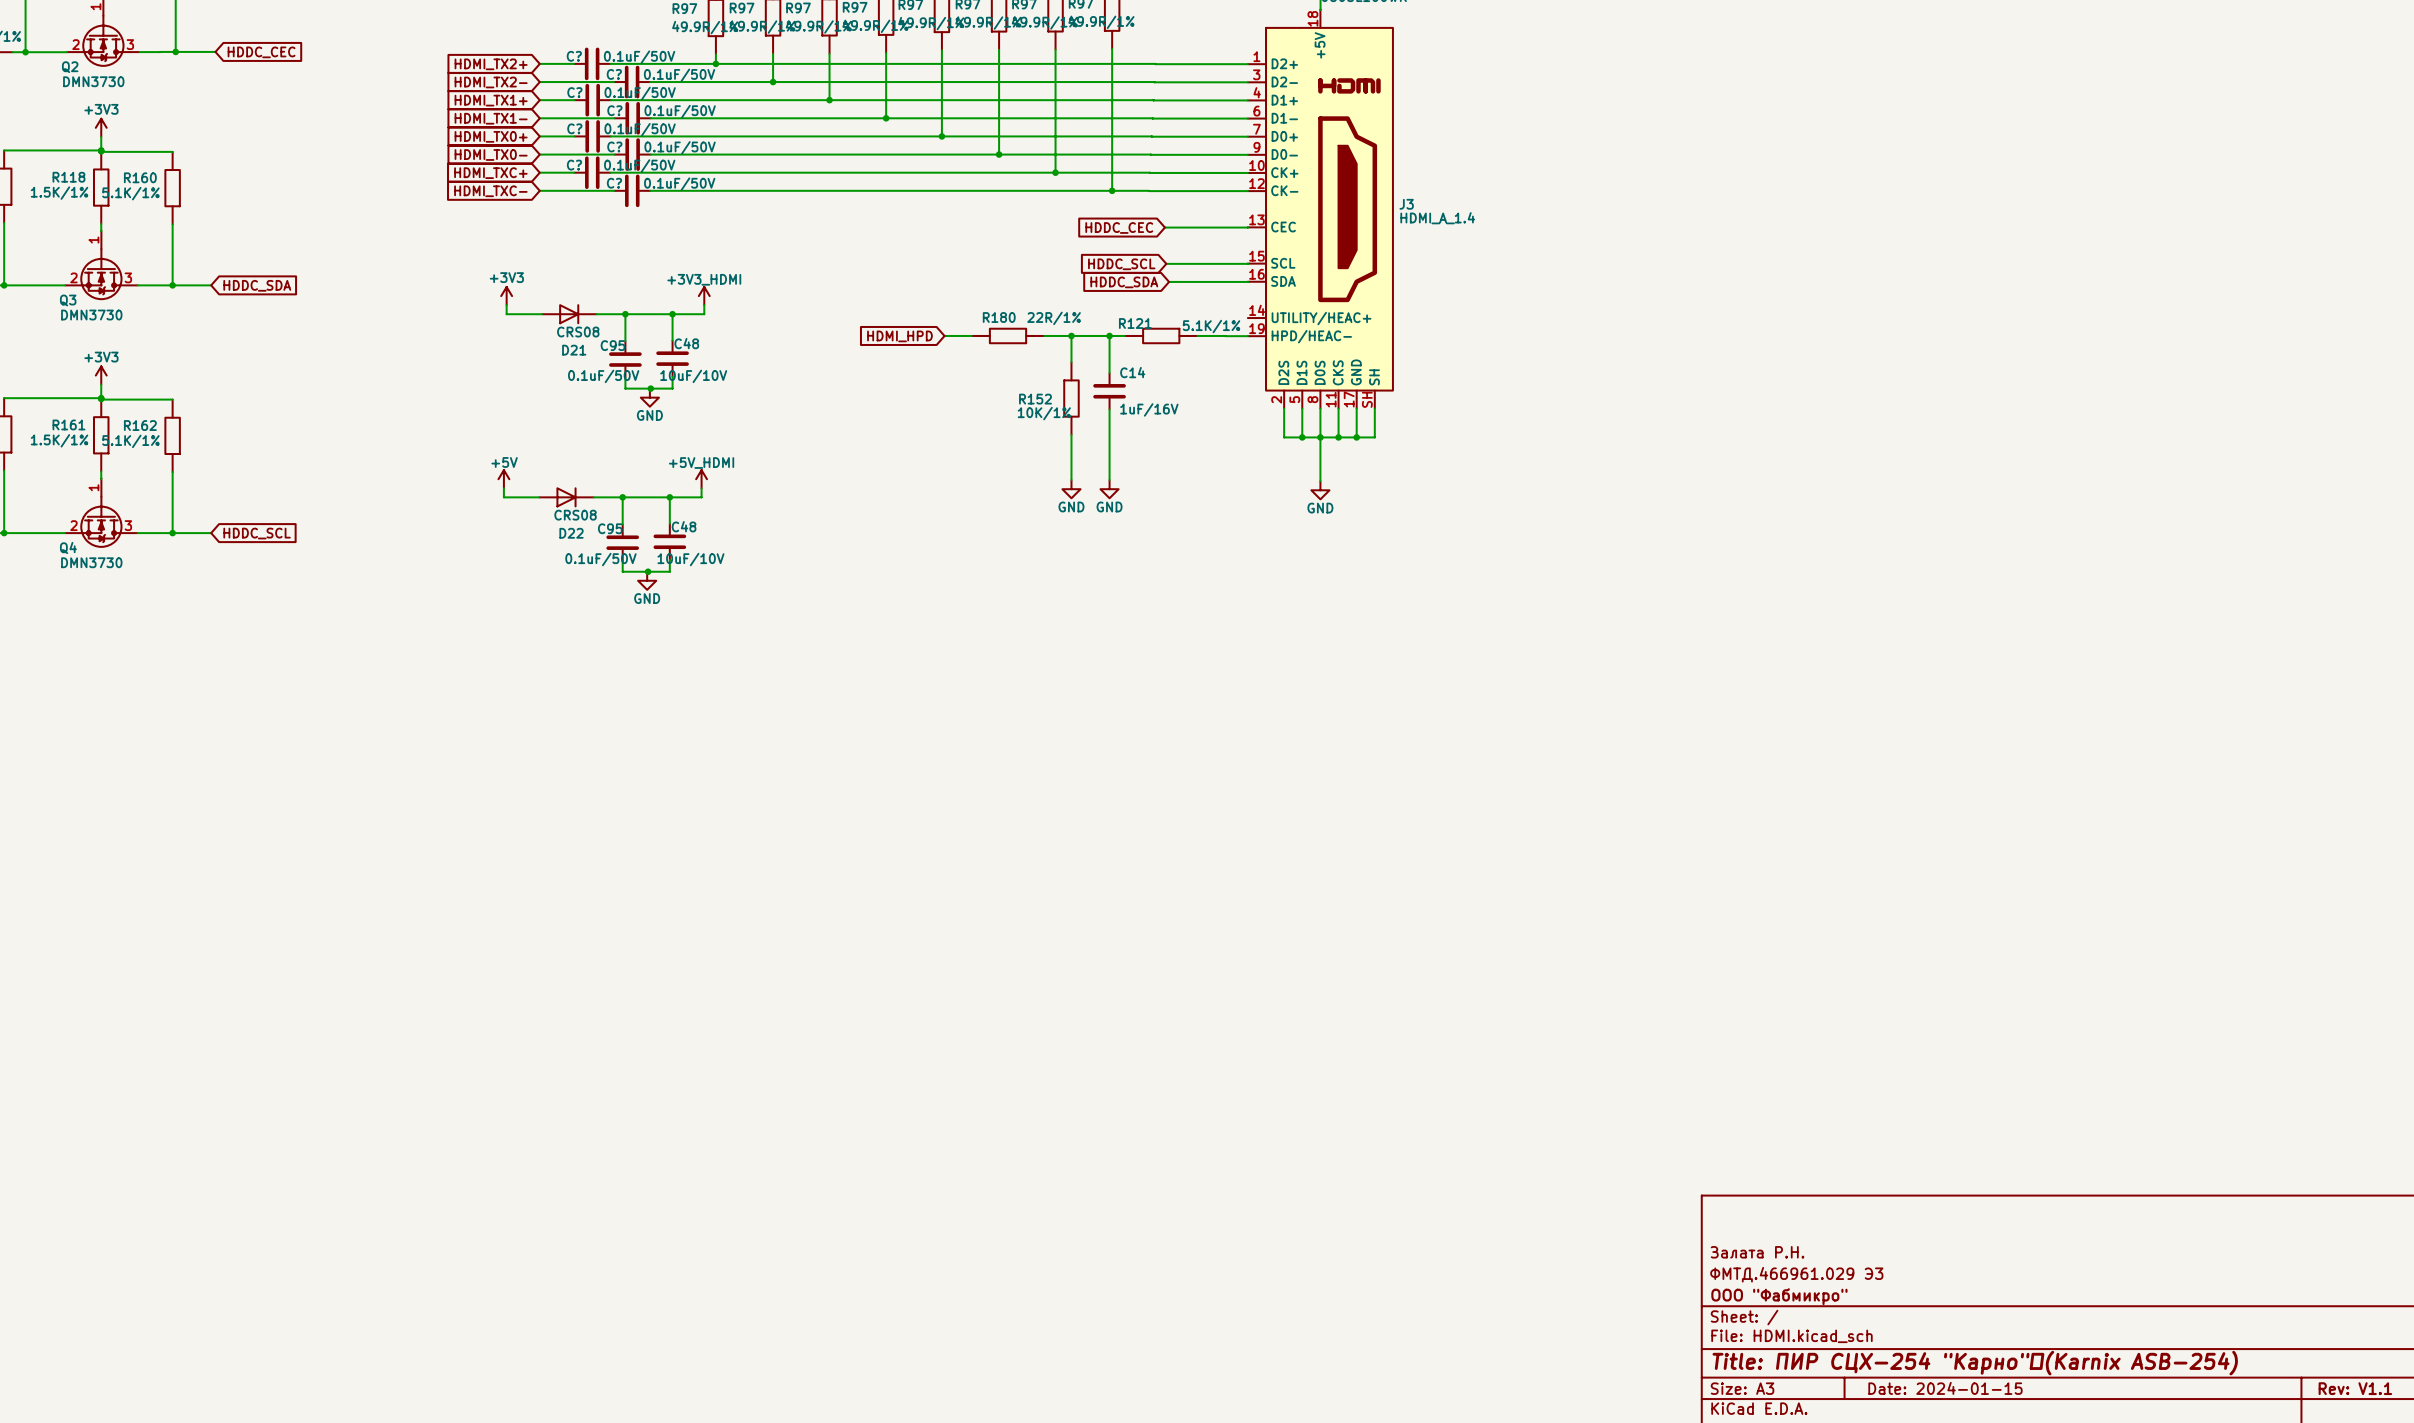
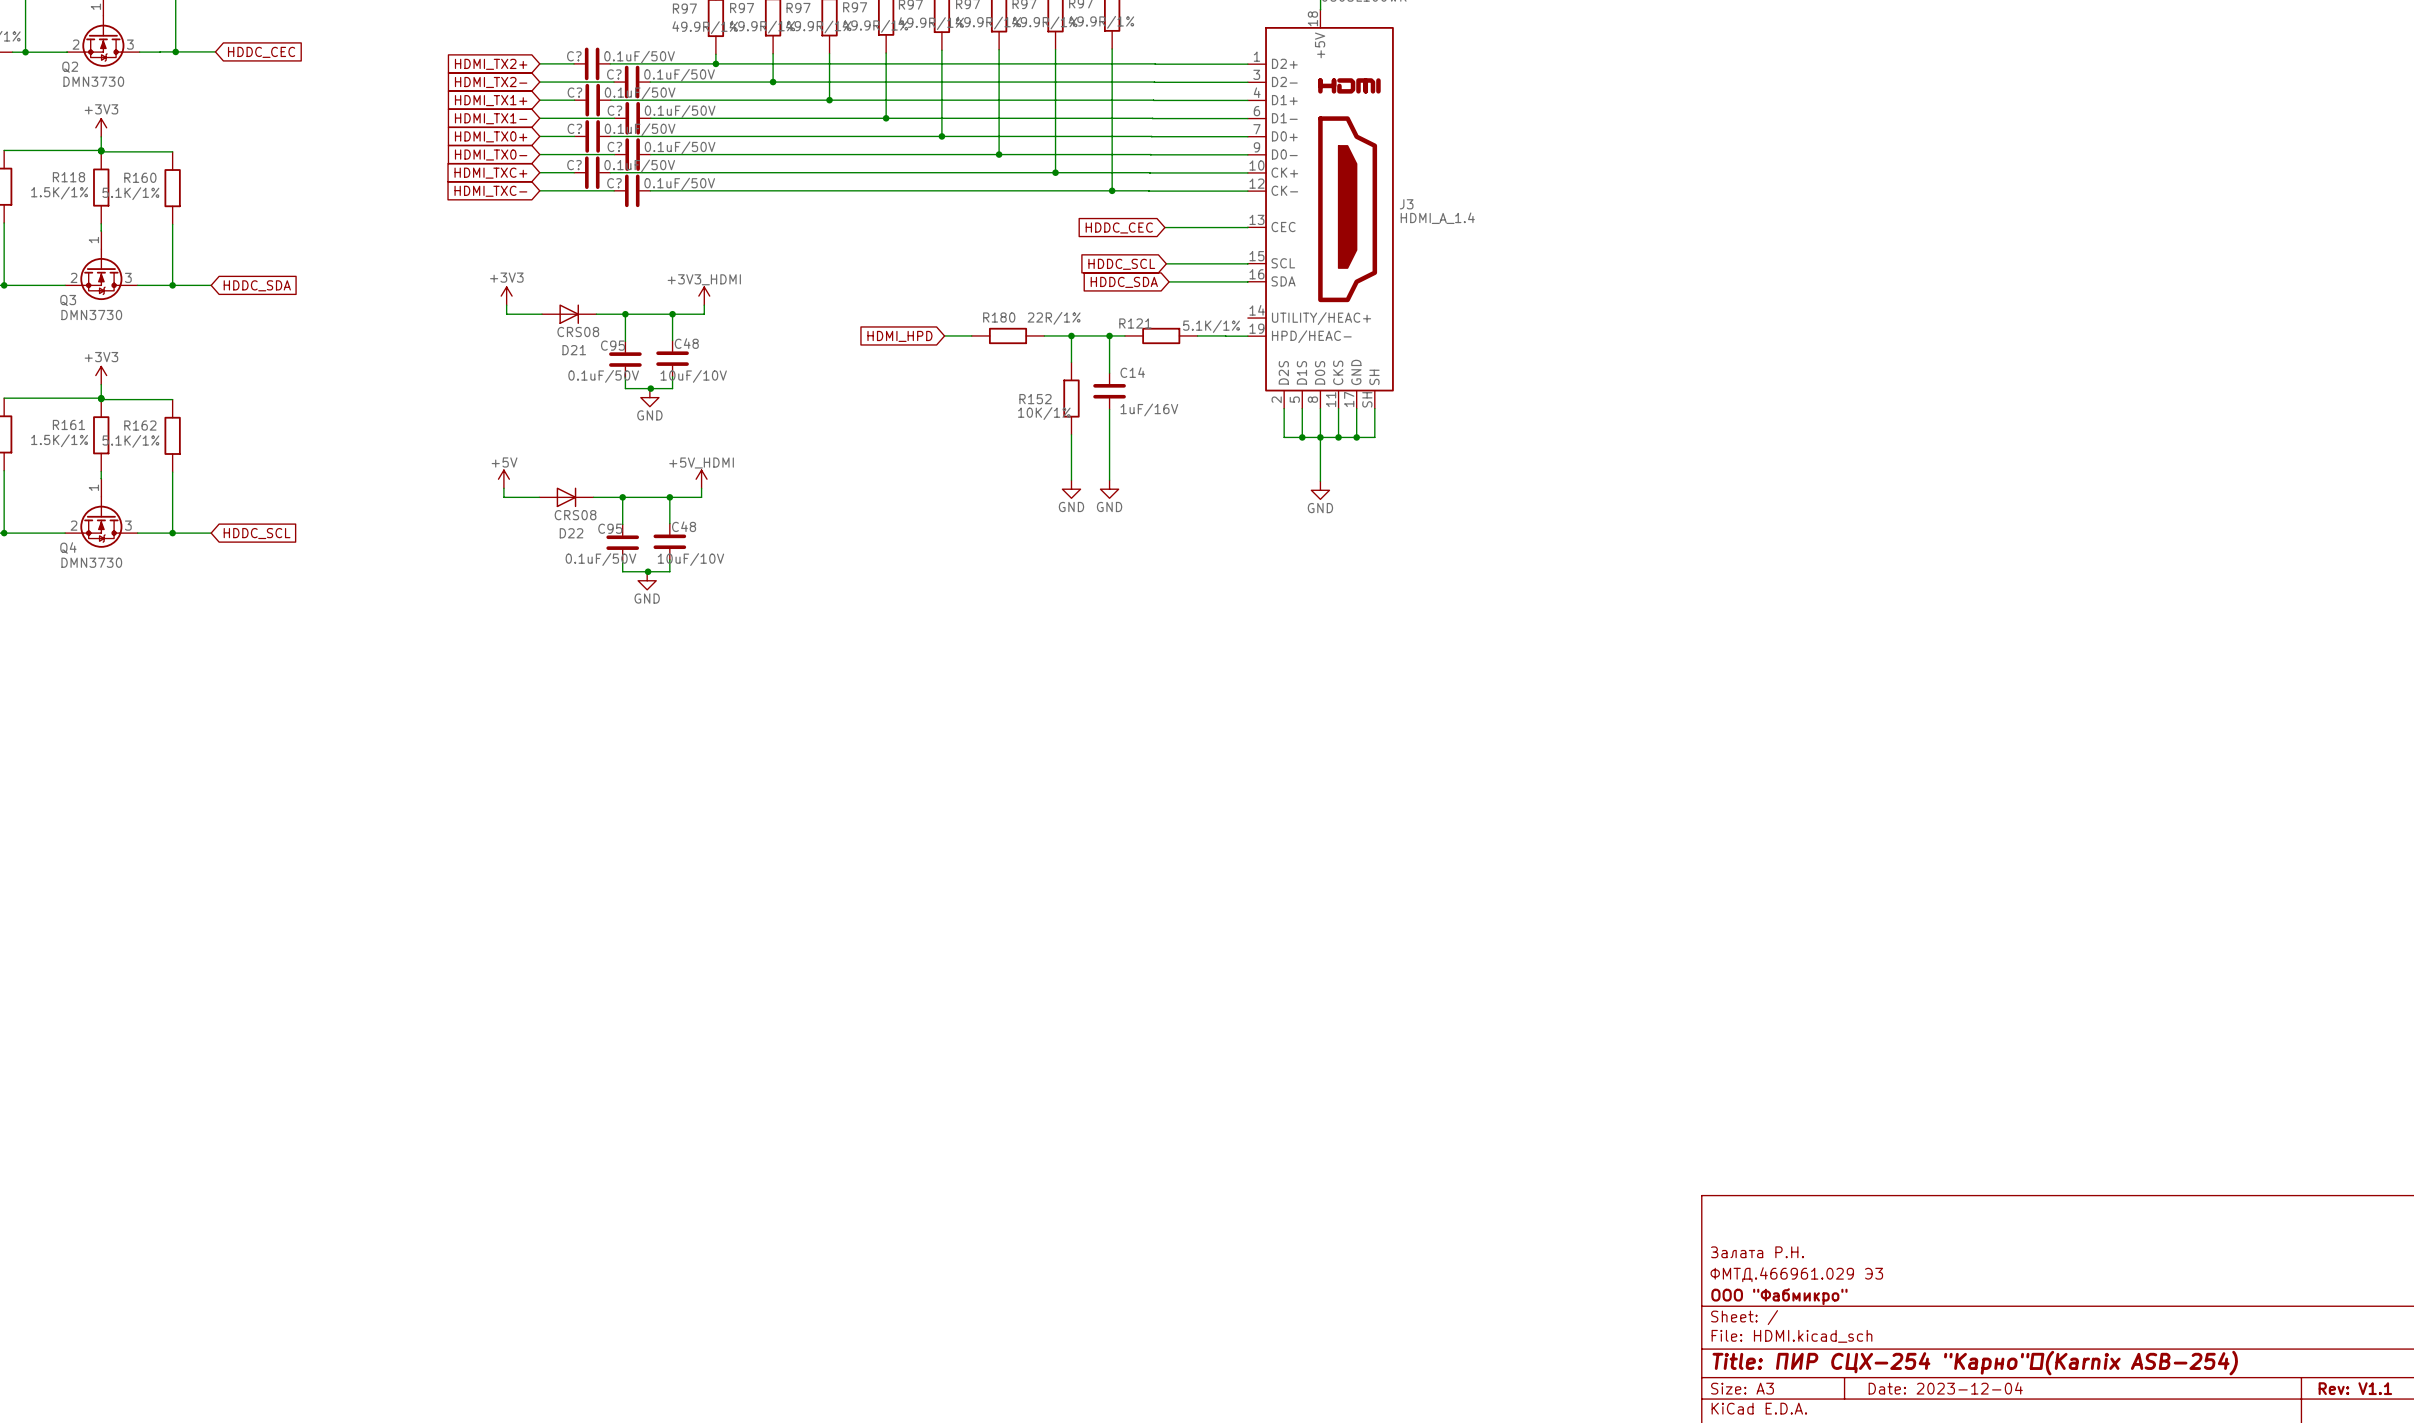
title block: Date: 2024-01-15 (1945, 1388) -> Date: 2023-12-04 (1945, 1388)

